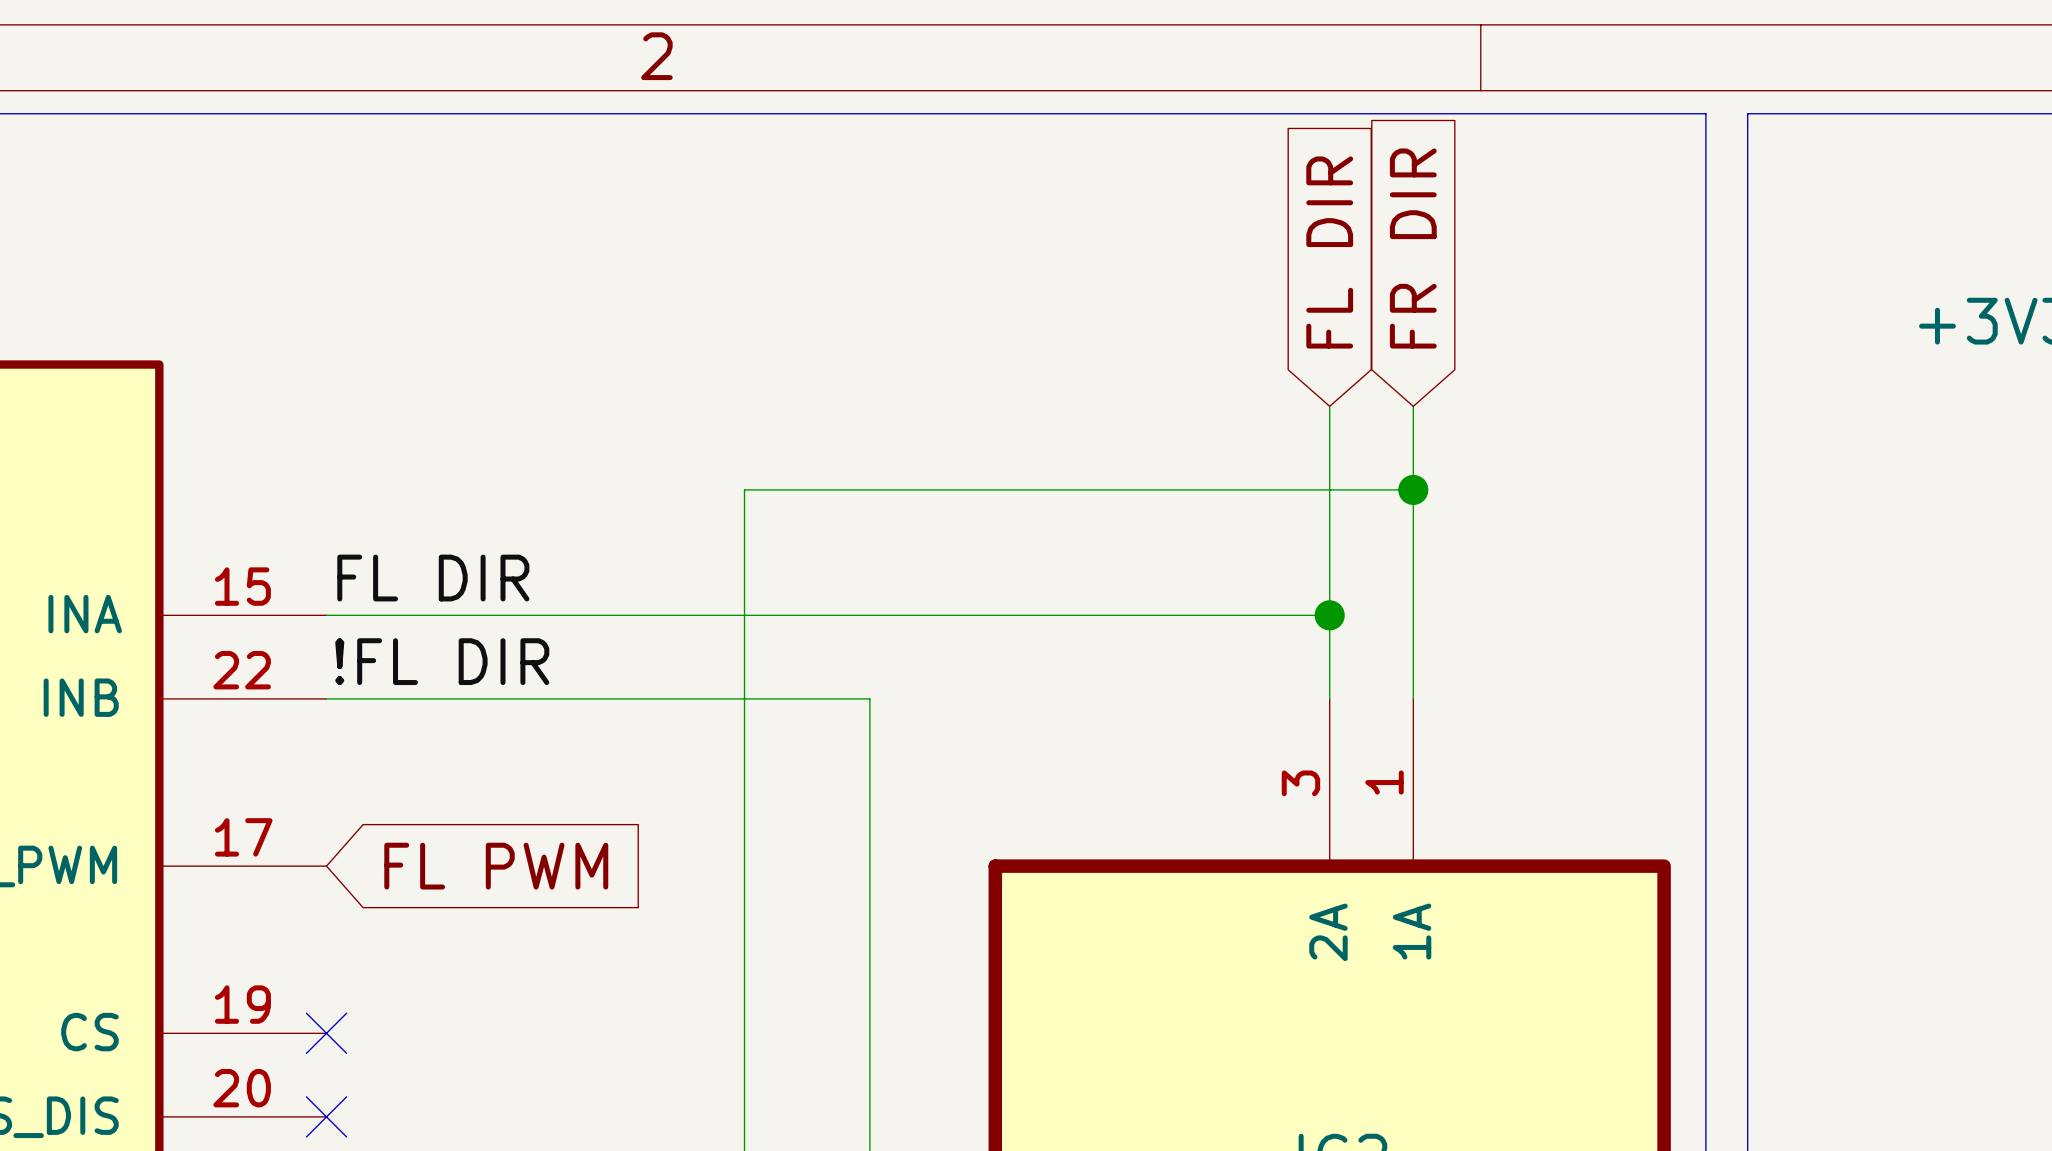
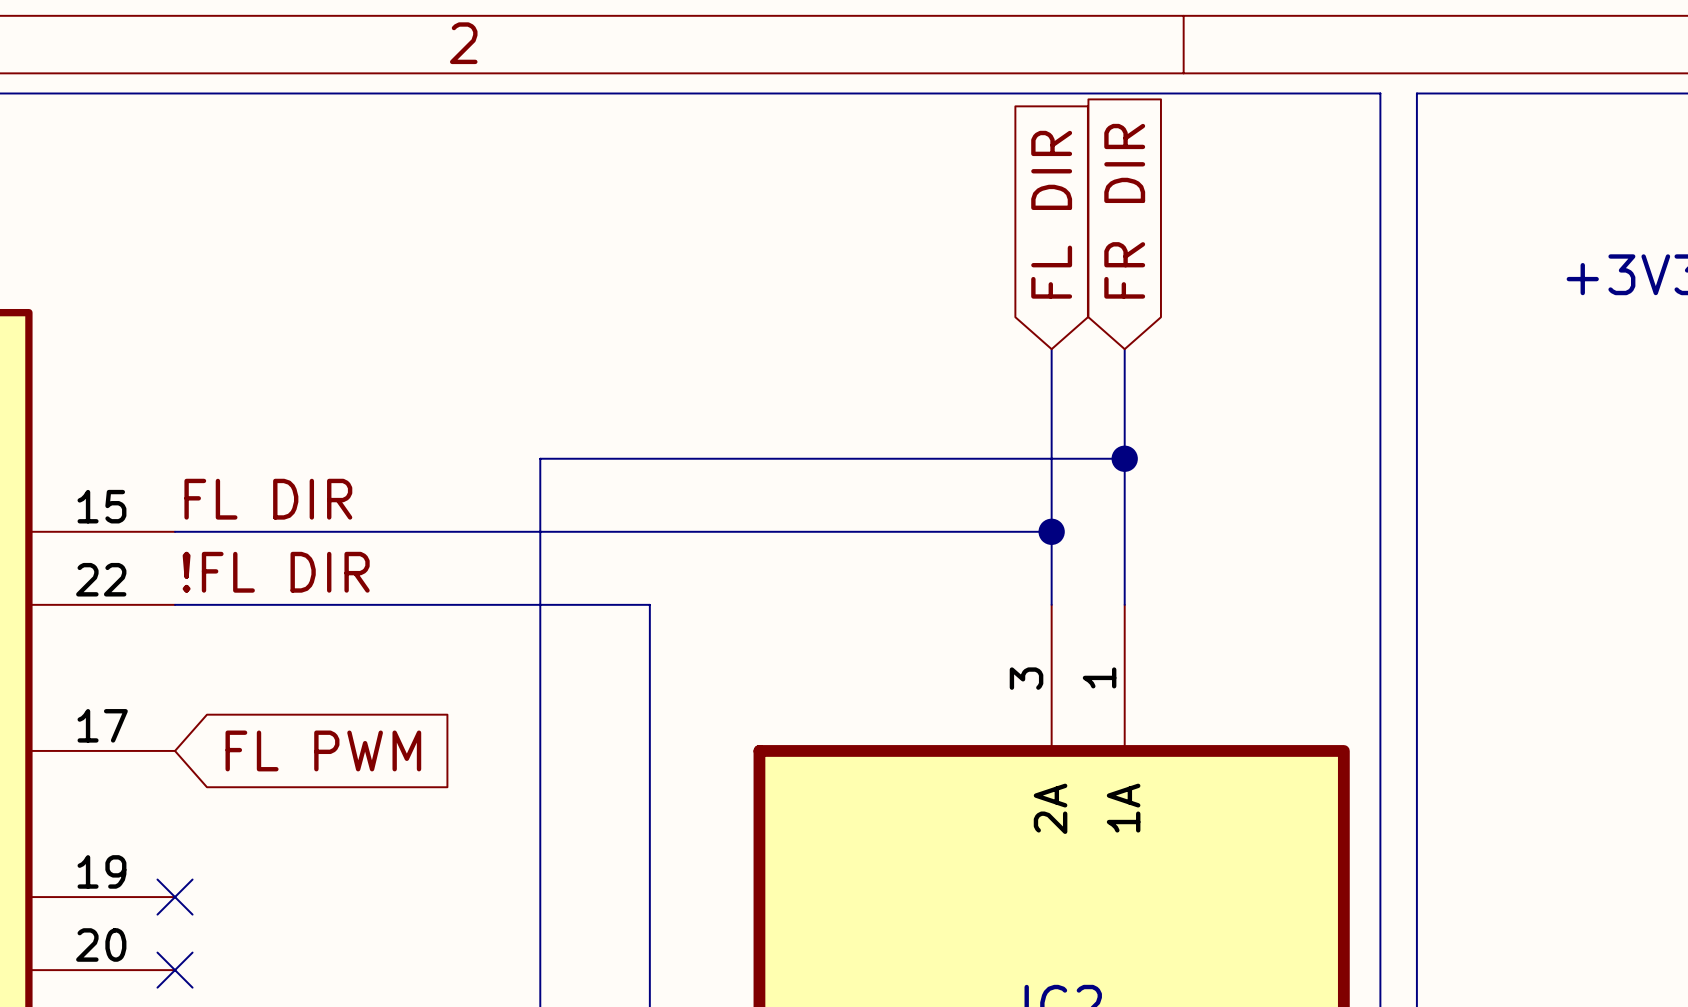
wire: (1413, 489) (744, 489) (744, 531) -> (1124, 458) (540, 458)
junction position: (1413, 489) -> (1124, 458)

